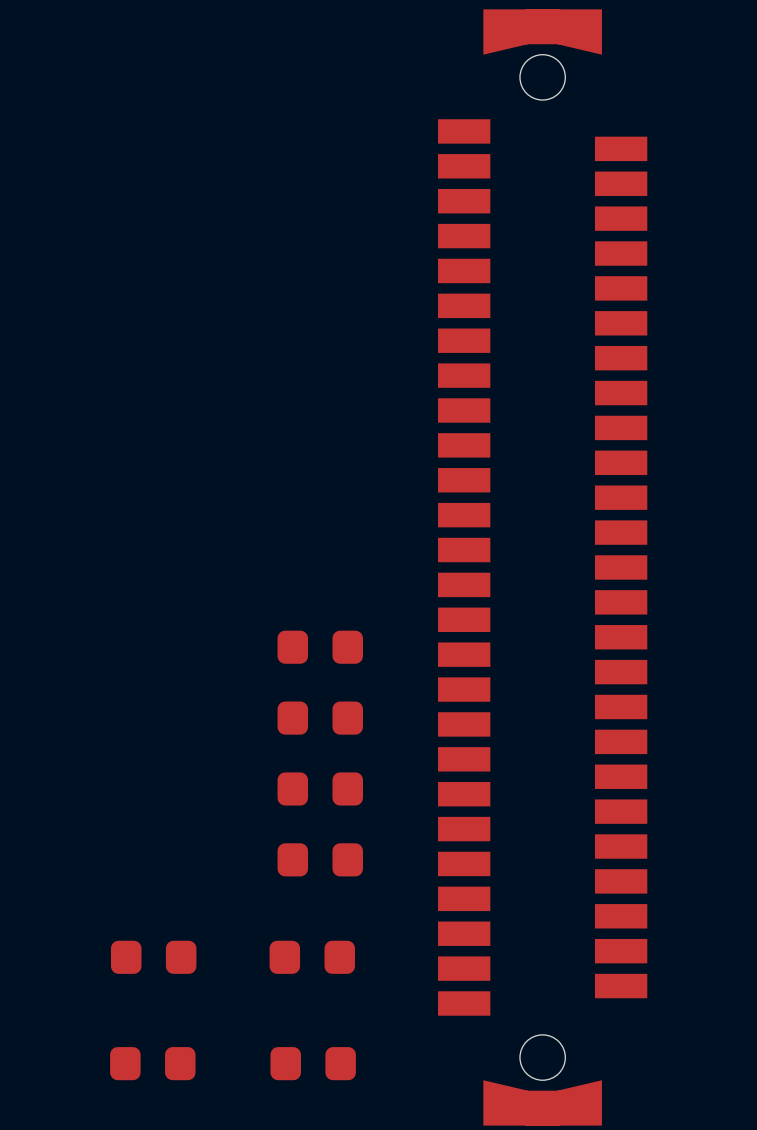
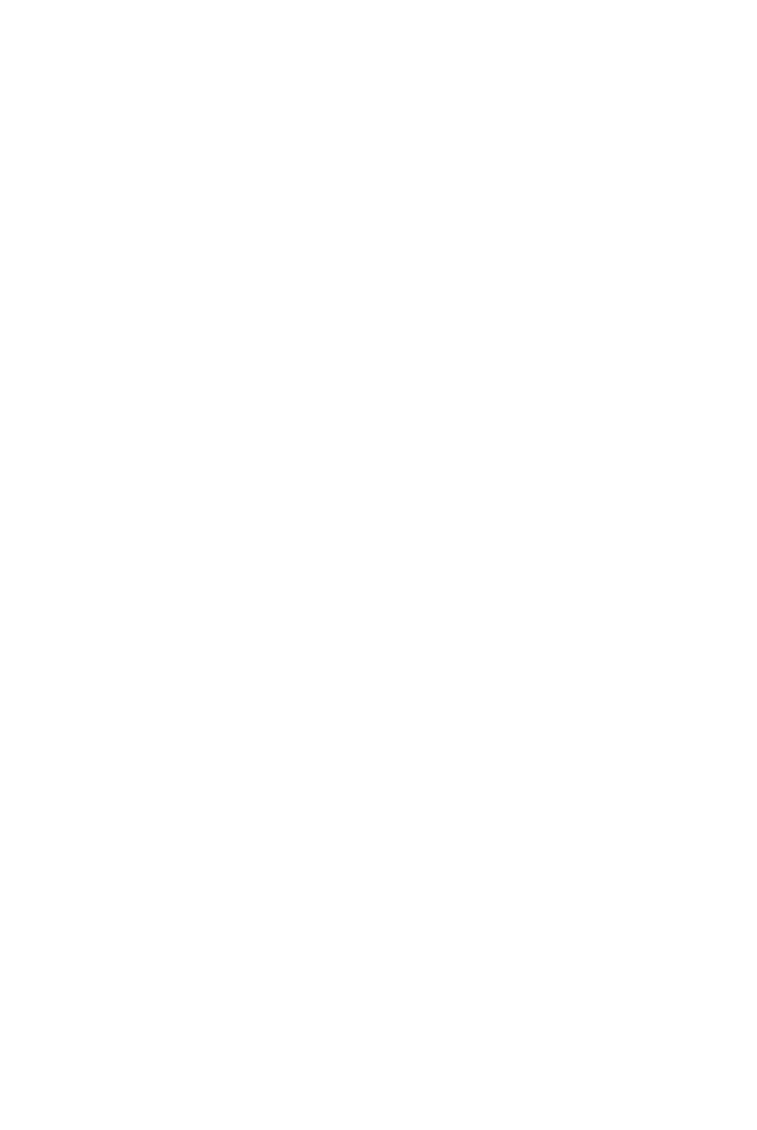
part: (542, 567) -> none
part: (320, 647) -> none
part: (320, 718) -> none
part: (320, 788) -> none
part: (320, 859) -> none
part: (153, 957) -> none
part: (312, 957) -> none
part: (152, 1063) -> none
part: (313, 1063) -> none

